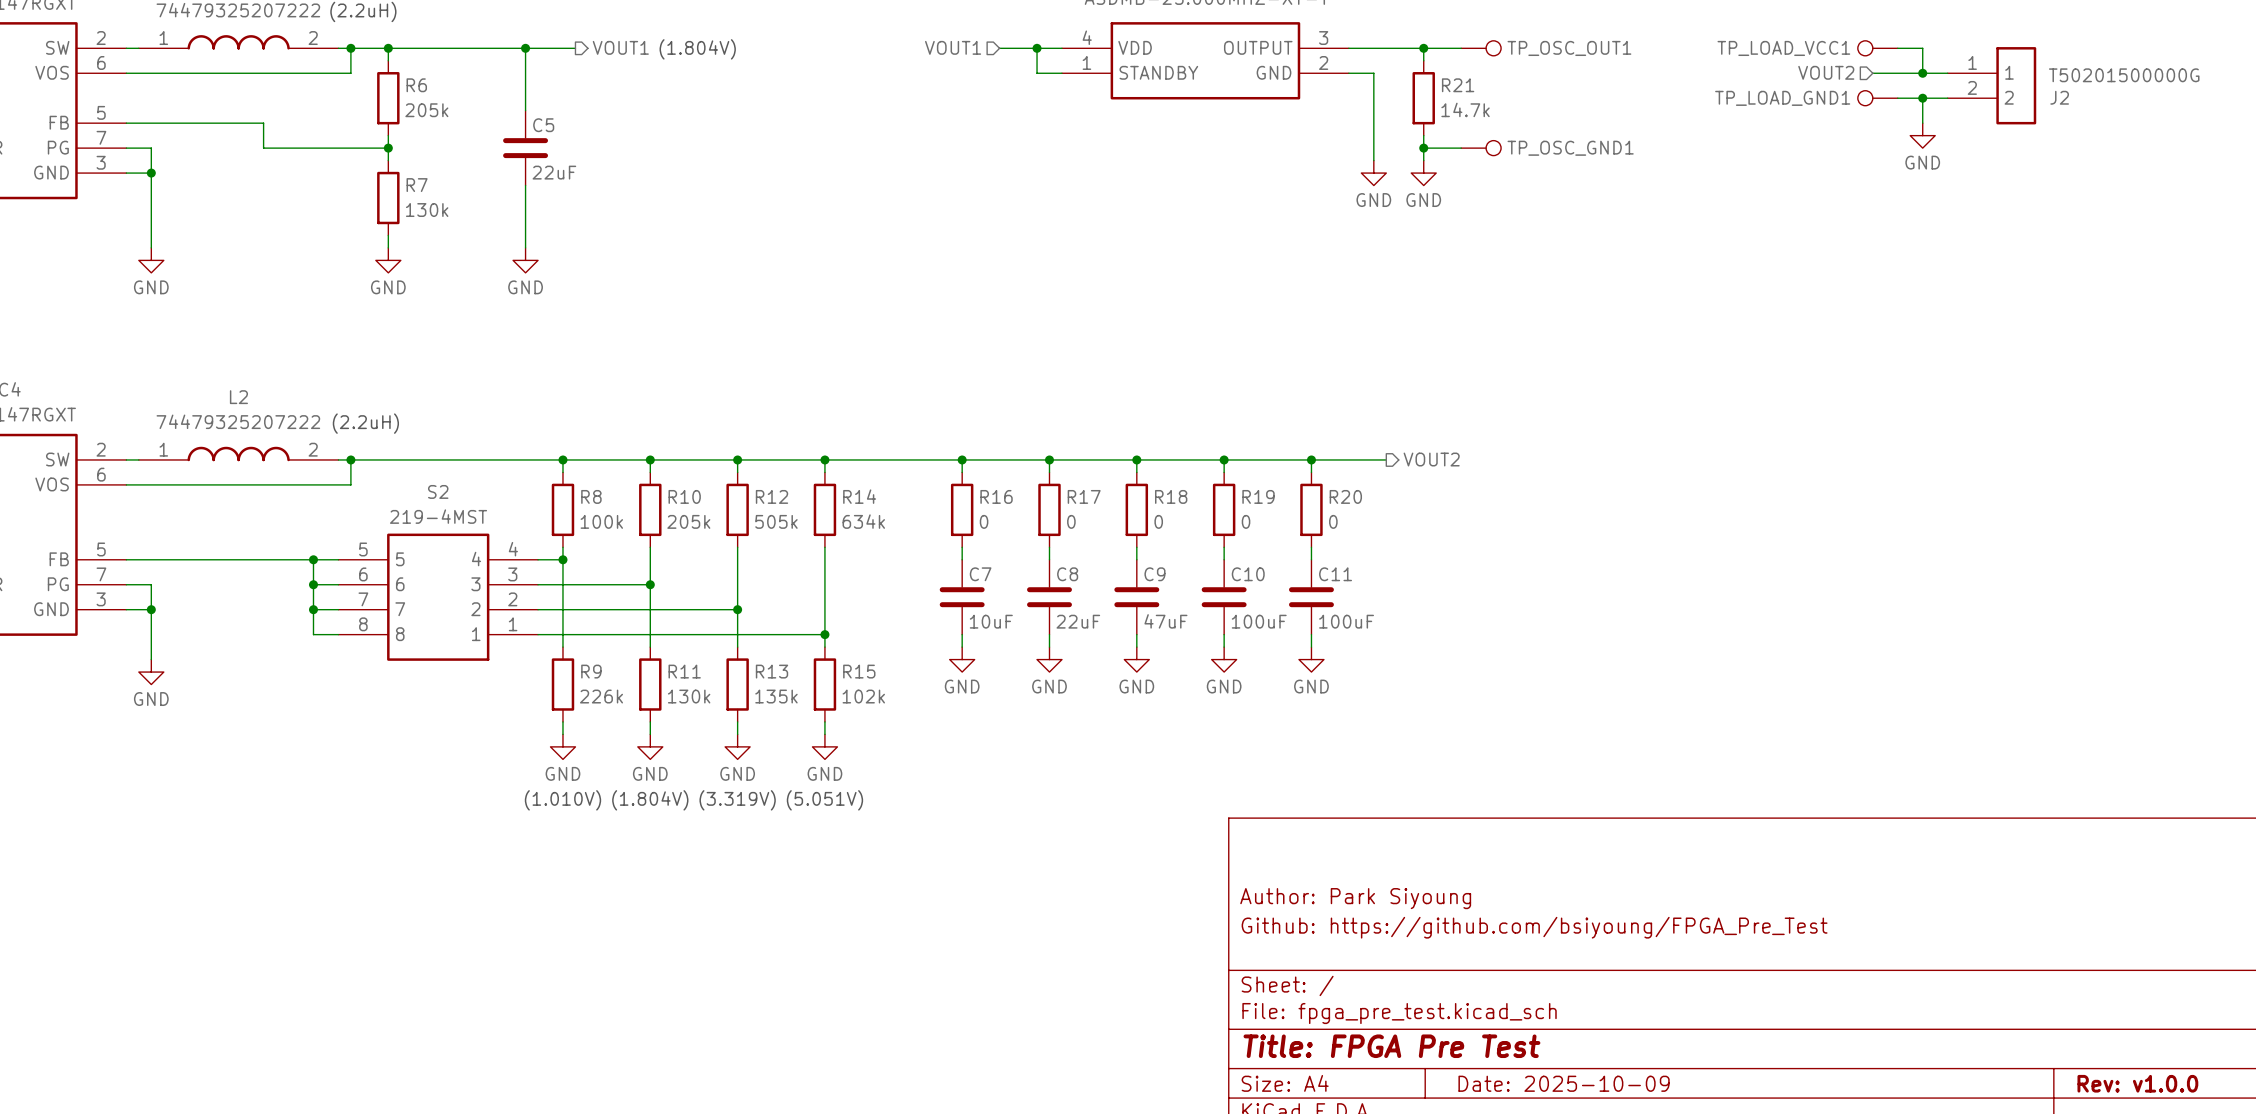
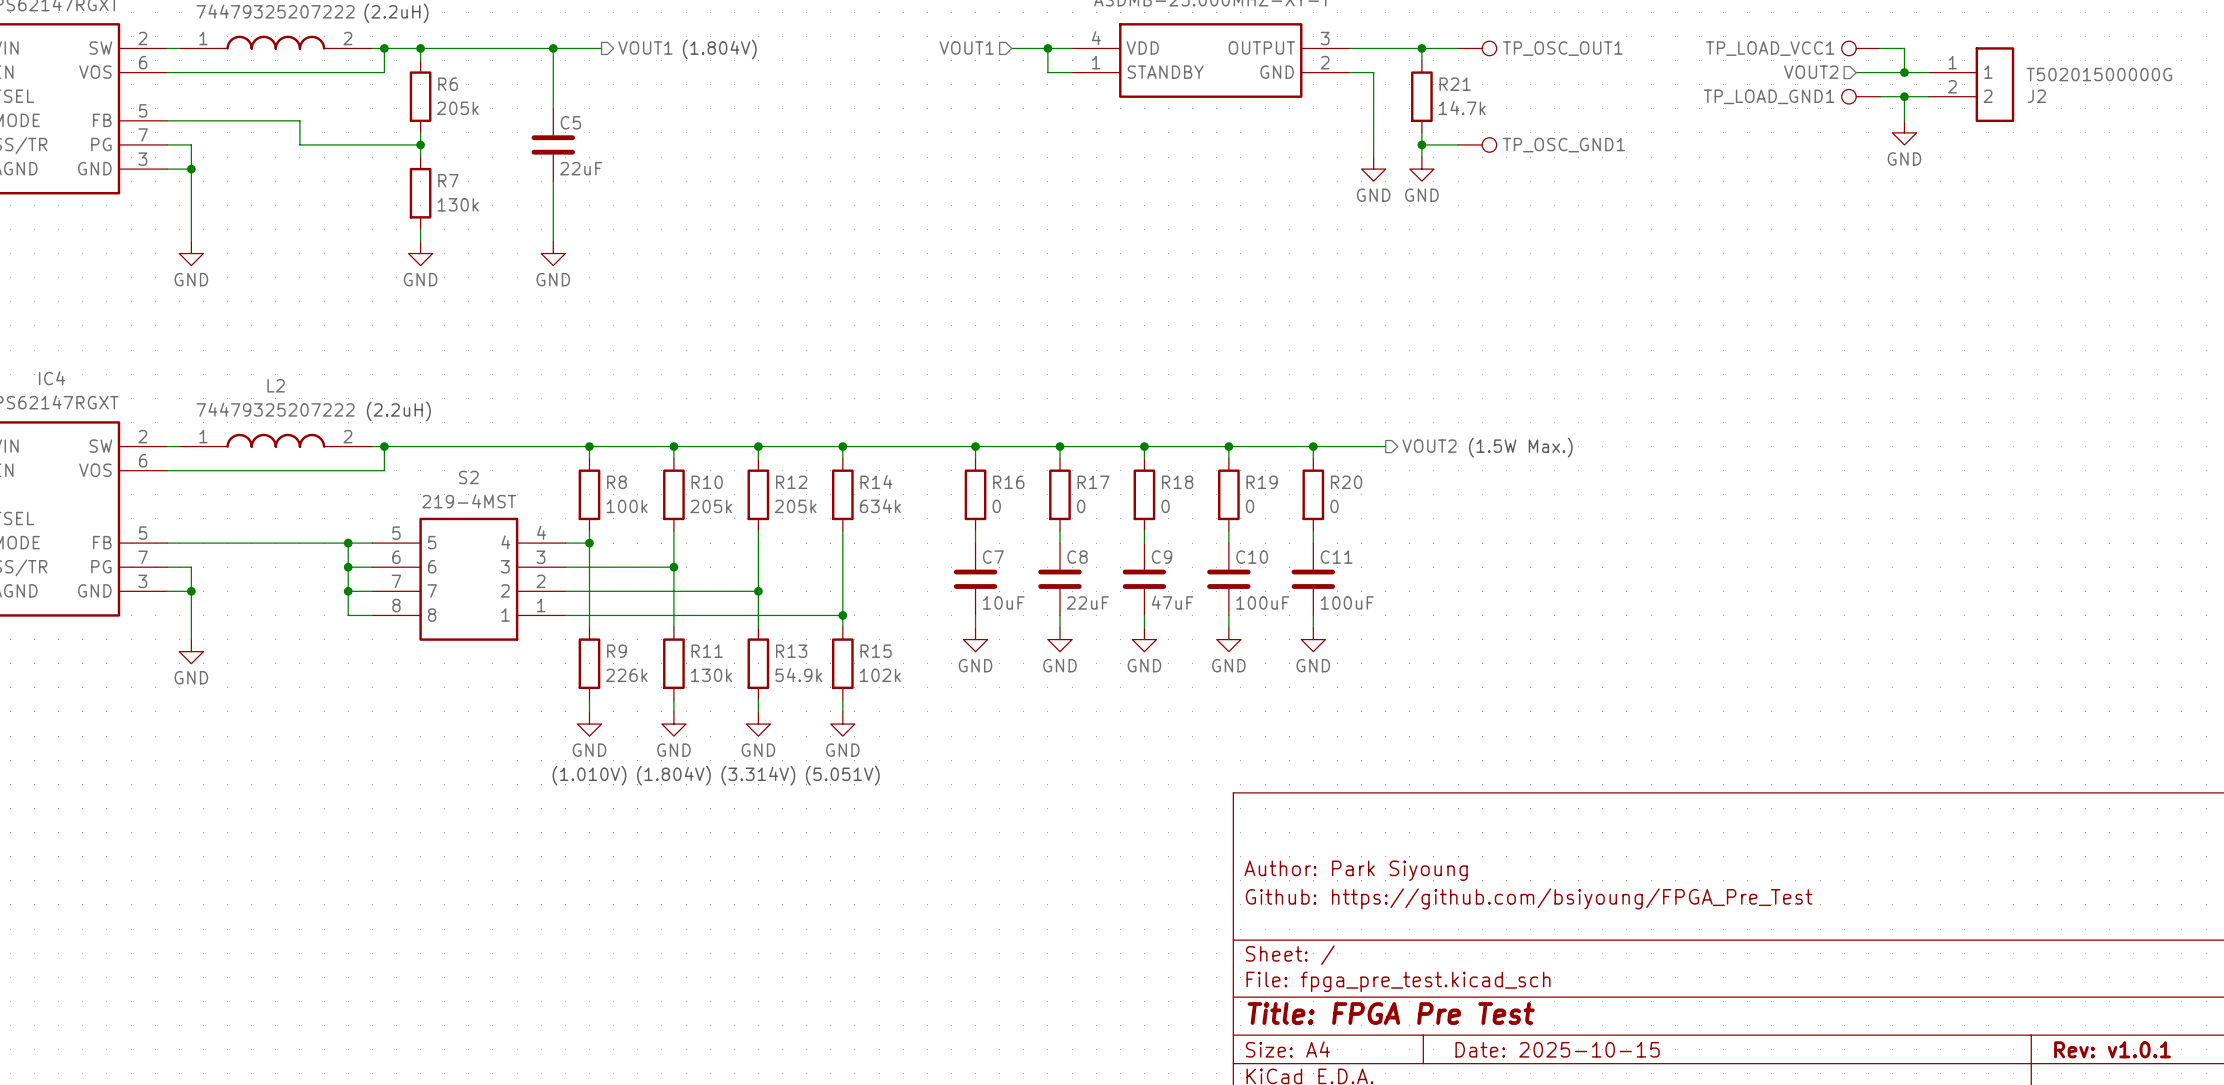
text: none -> (1.5W Max.) (1520, 447)
R12 value: 505k (776, 521) -> 205k (795, 506)
R13 value: 135k (776, 696) -> 54.9k (798, 675)
text: (3.319V) (737, 800) -> (3.314V) (758, 775)
title block: Date: 2025-10-09 (1564, 1083) -> Date: 2025-10-15 (1557, 1049)
title block: Rev: v1.0.0 (2137, 1083) -> Rev: v1.0.1 (2112, 1049)

